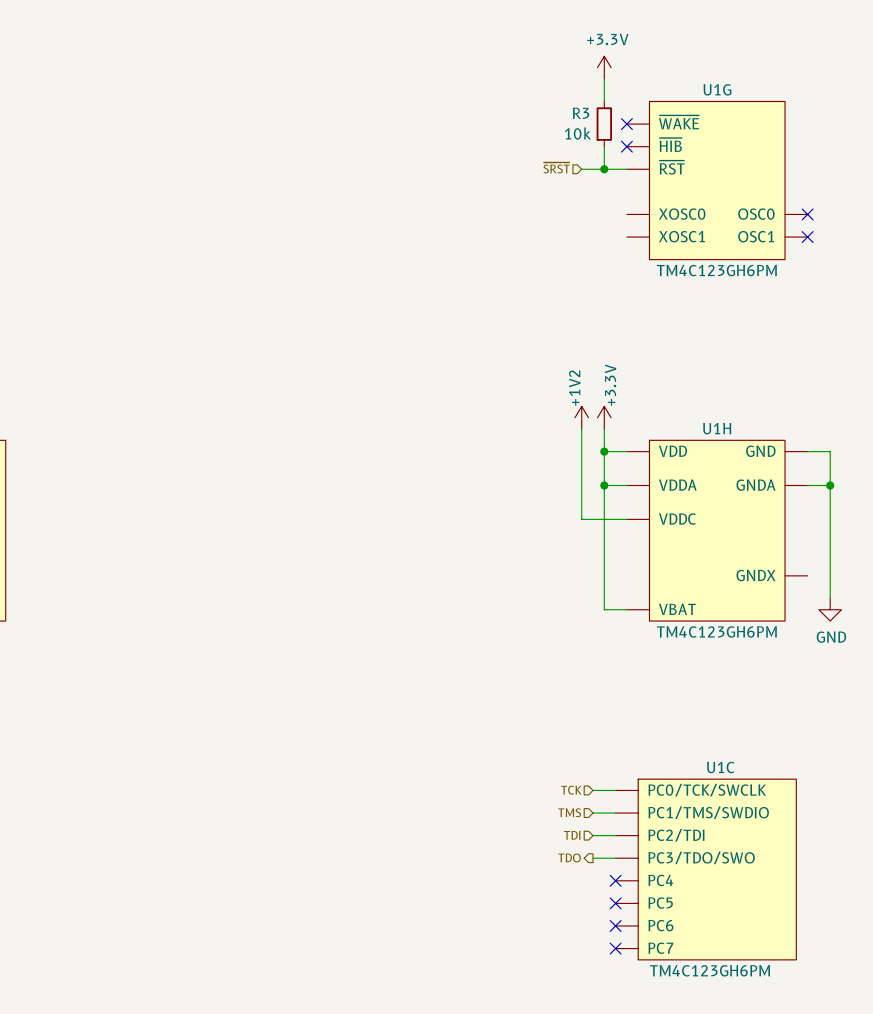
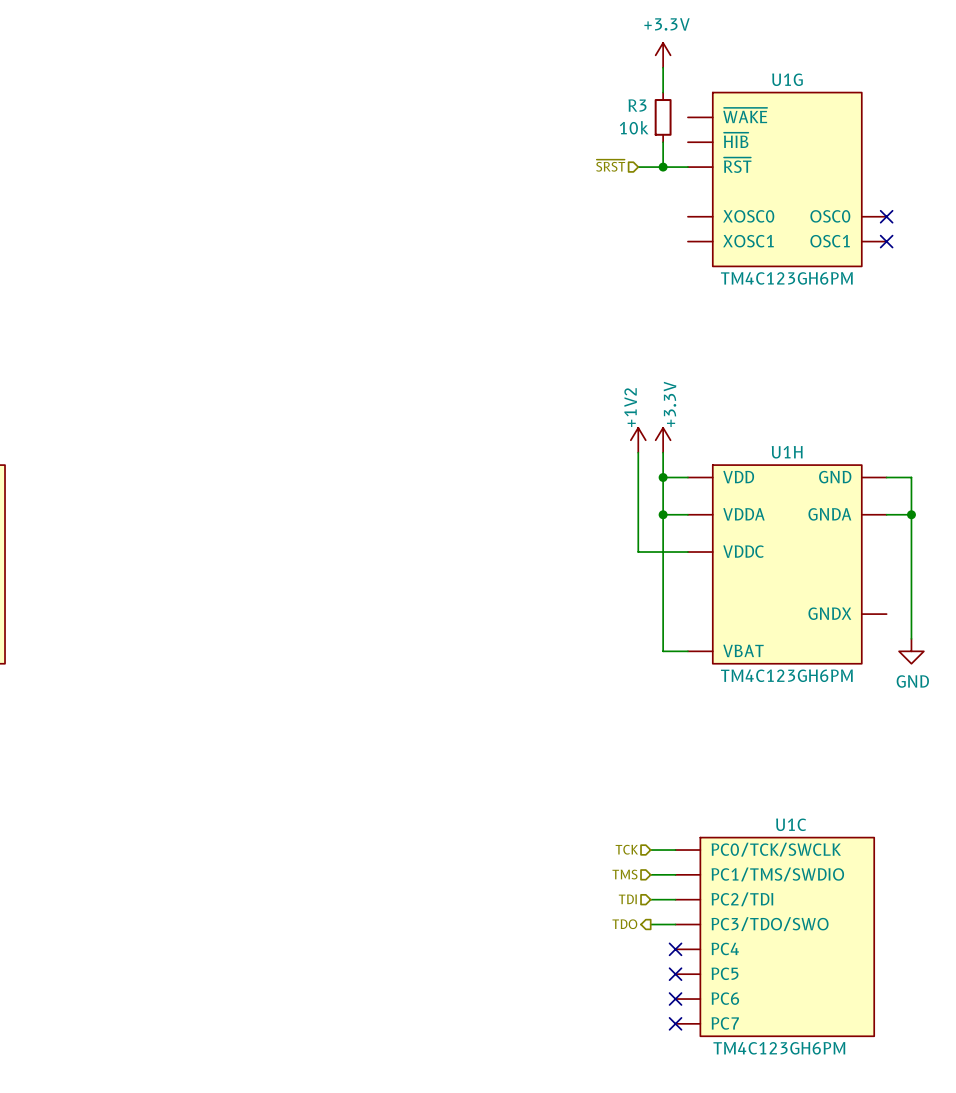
no-connect mark: (626, 124) -> none
no-connect mark: (626, 146) -> none

